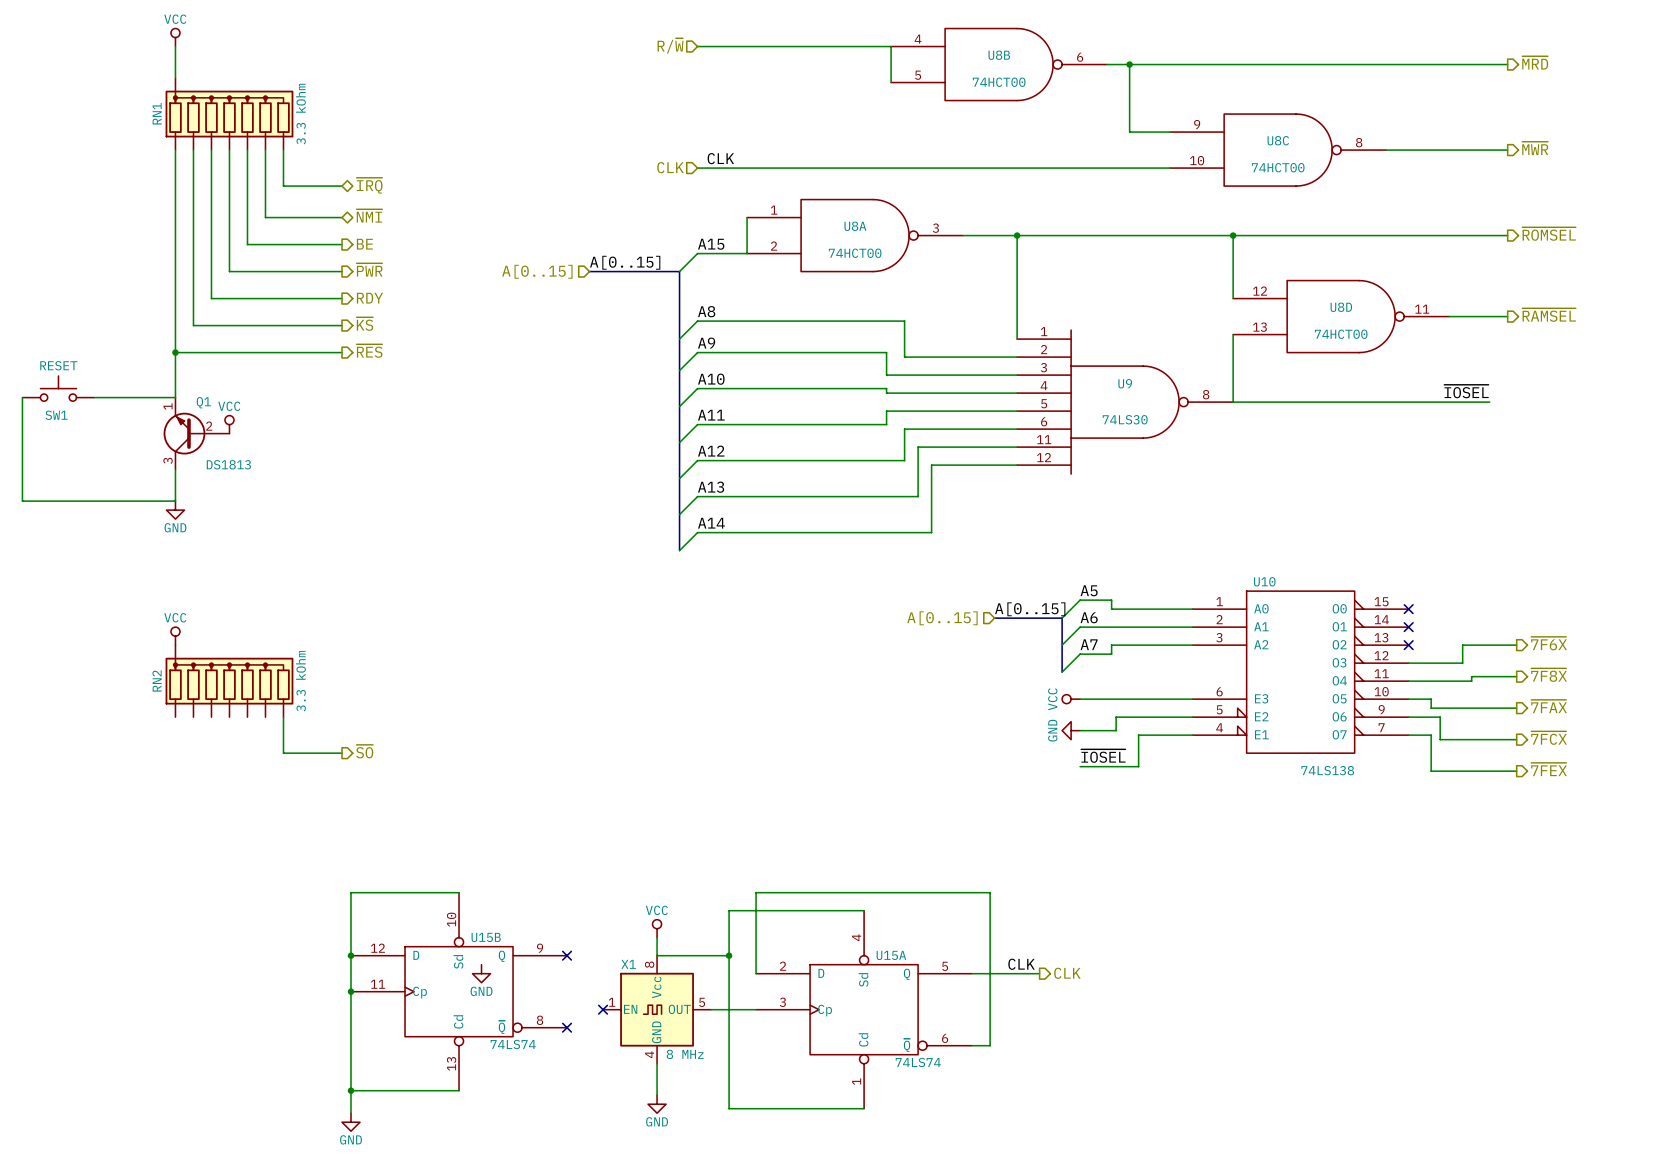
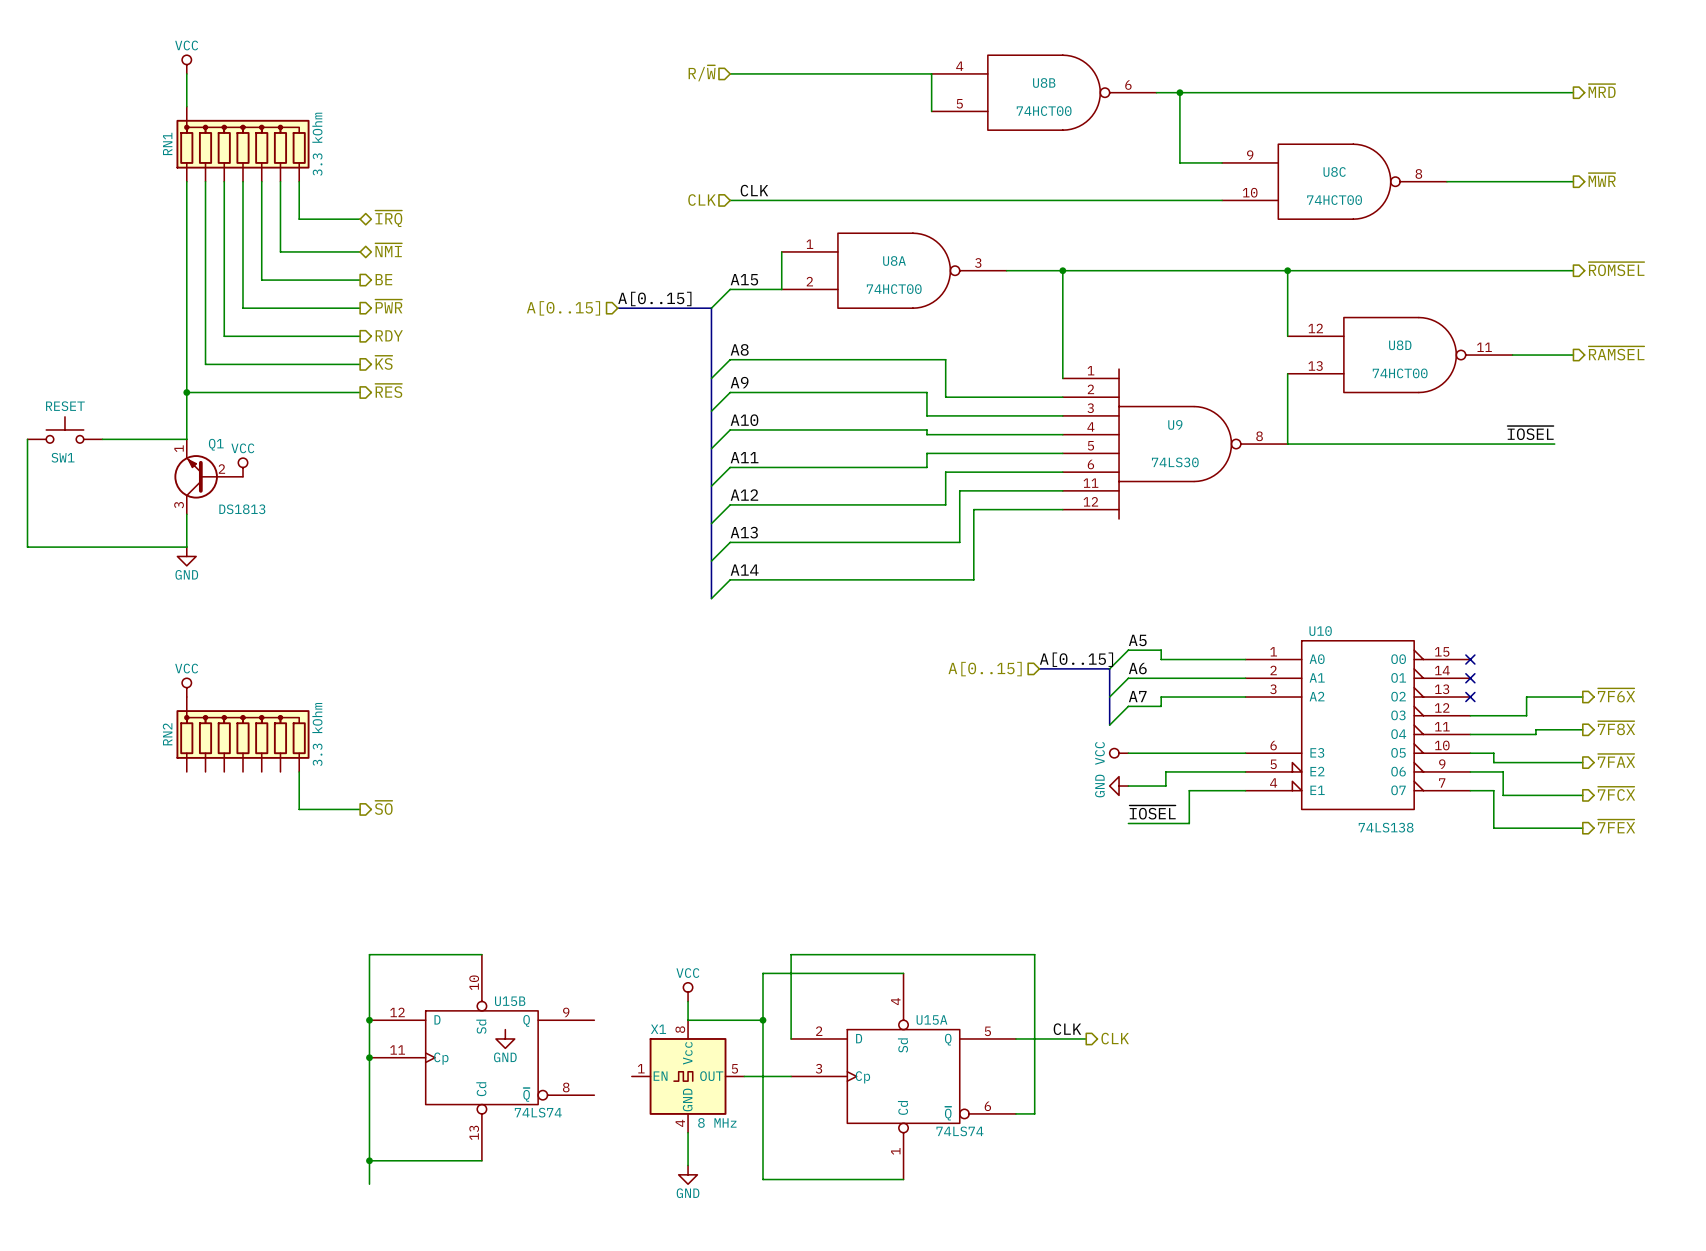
no-connect mark: (567, 955) -> none
no-connect mark: (603, 1009) -> none
no-connect mark: (567, 1027) -> none
power symbol: GND (351, 1122) -> none

